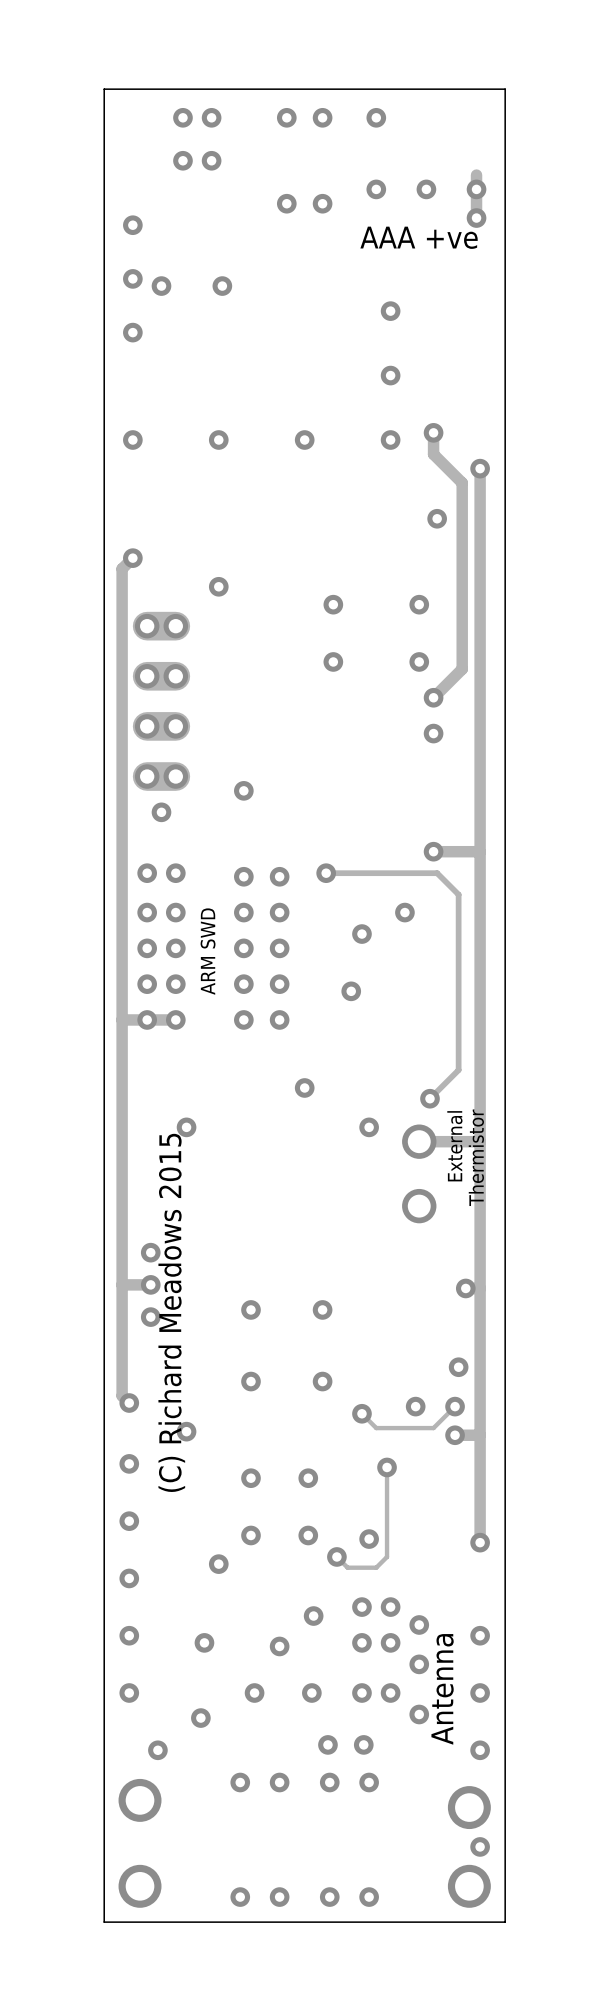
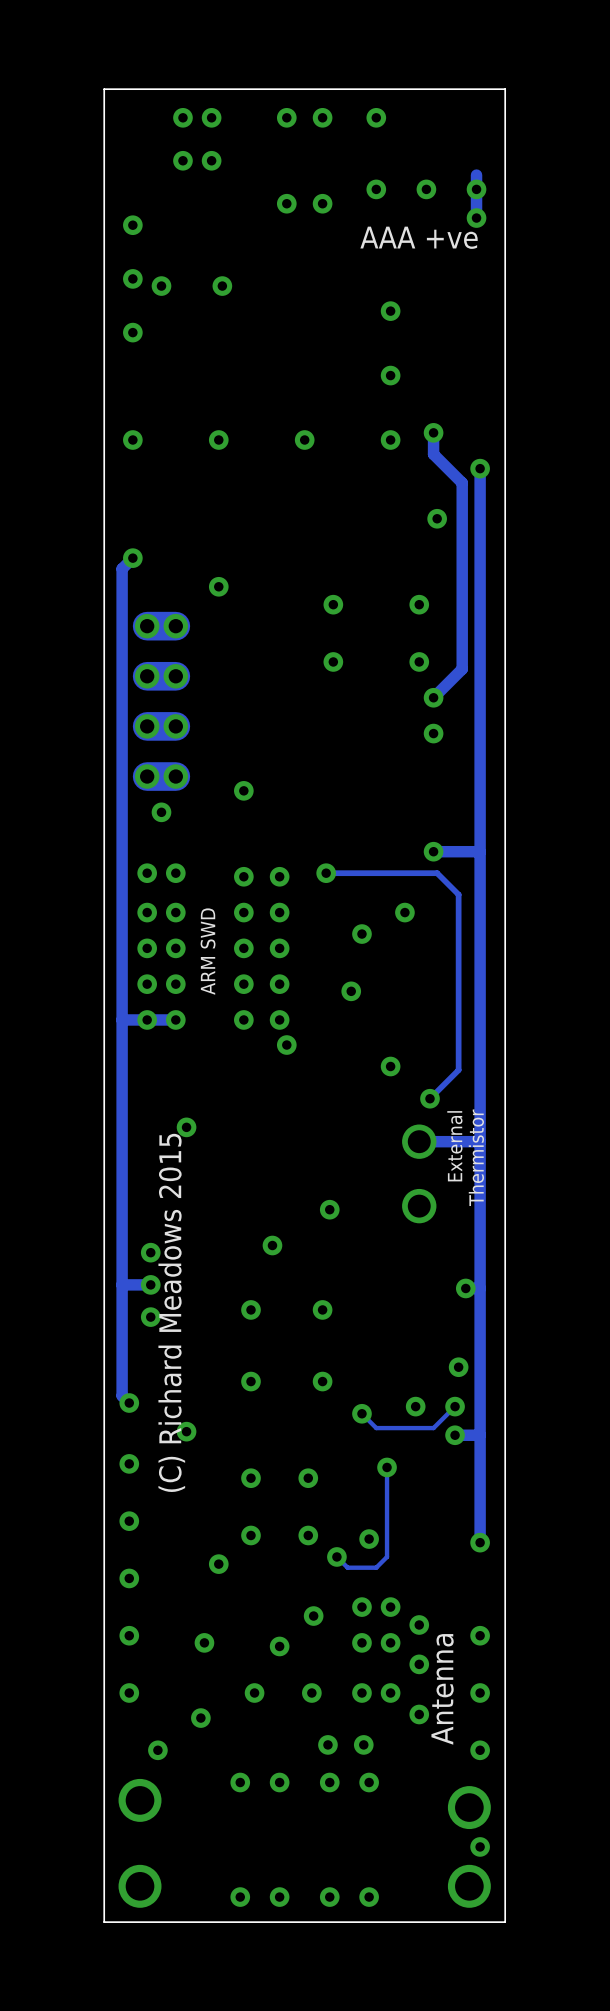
via: none -> (286, 1045)
via: none -> (390, 1066)
via: (304, 1087) -> none
via: (369, 1127) -> none
via: none -> (329, 1209)
via: none -> (272, 1245)

